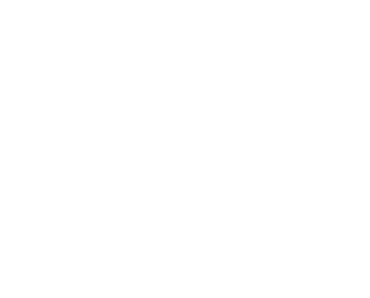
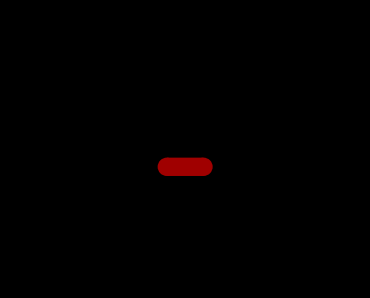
part: none -> (185, 166)

